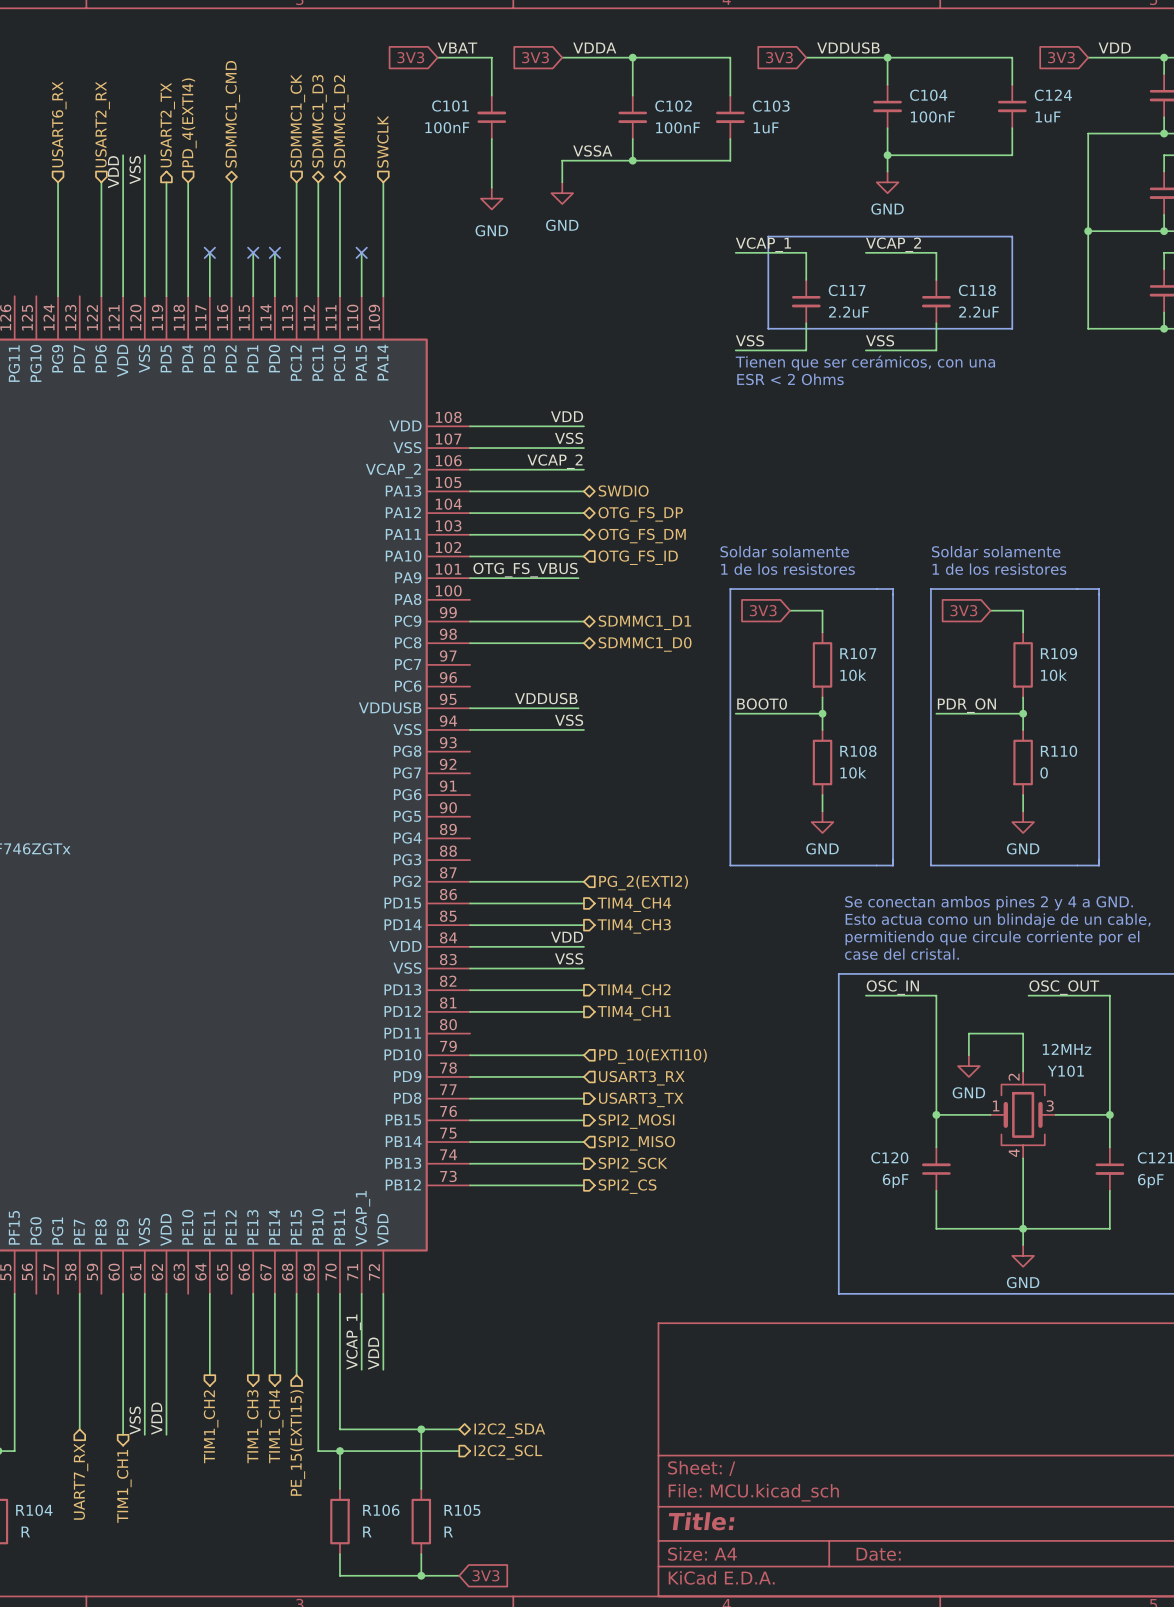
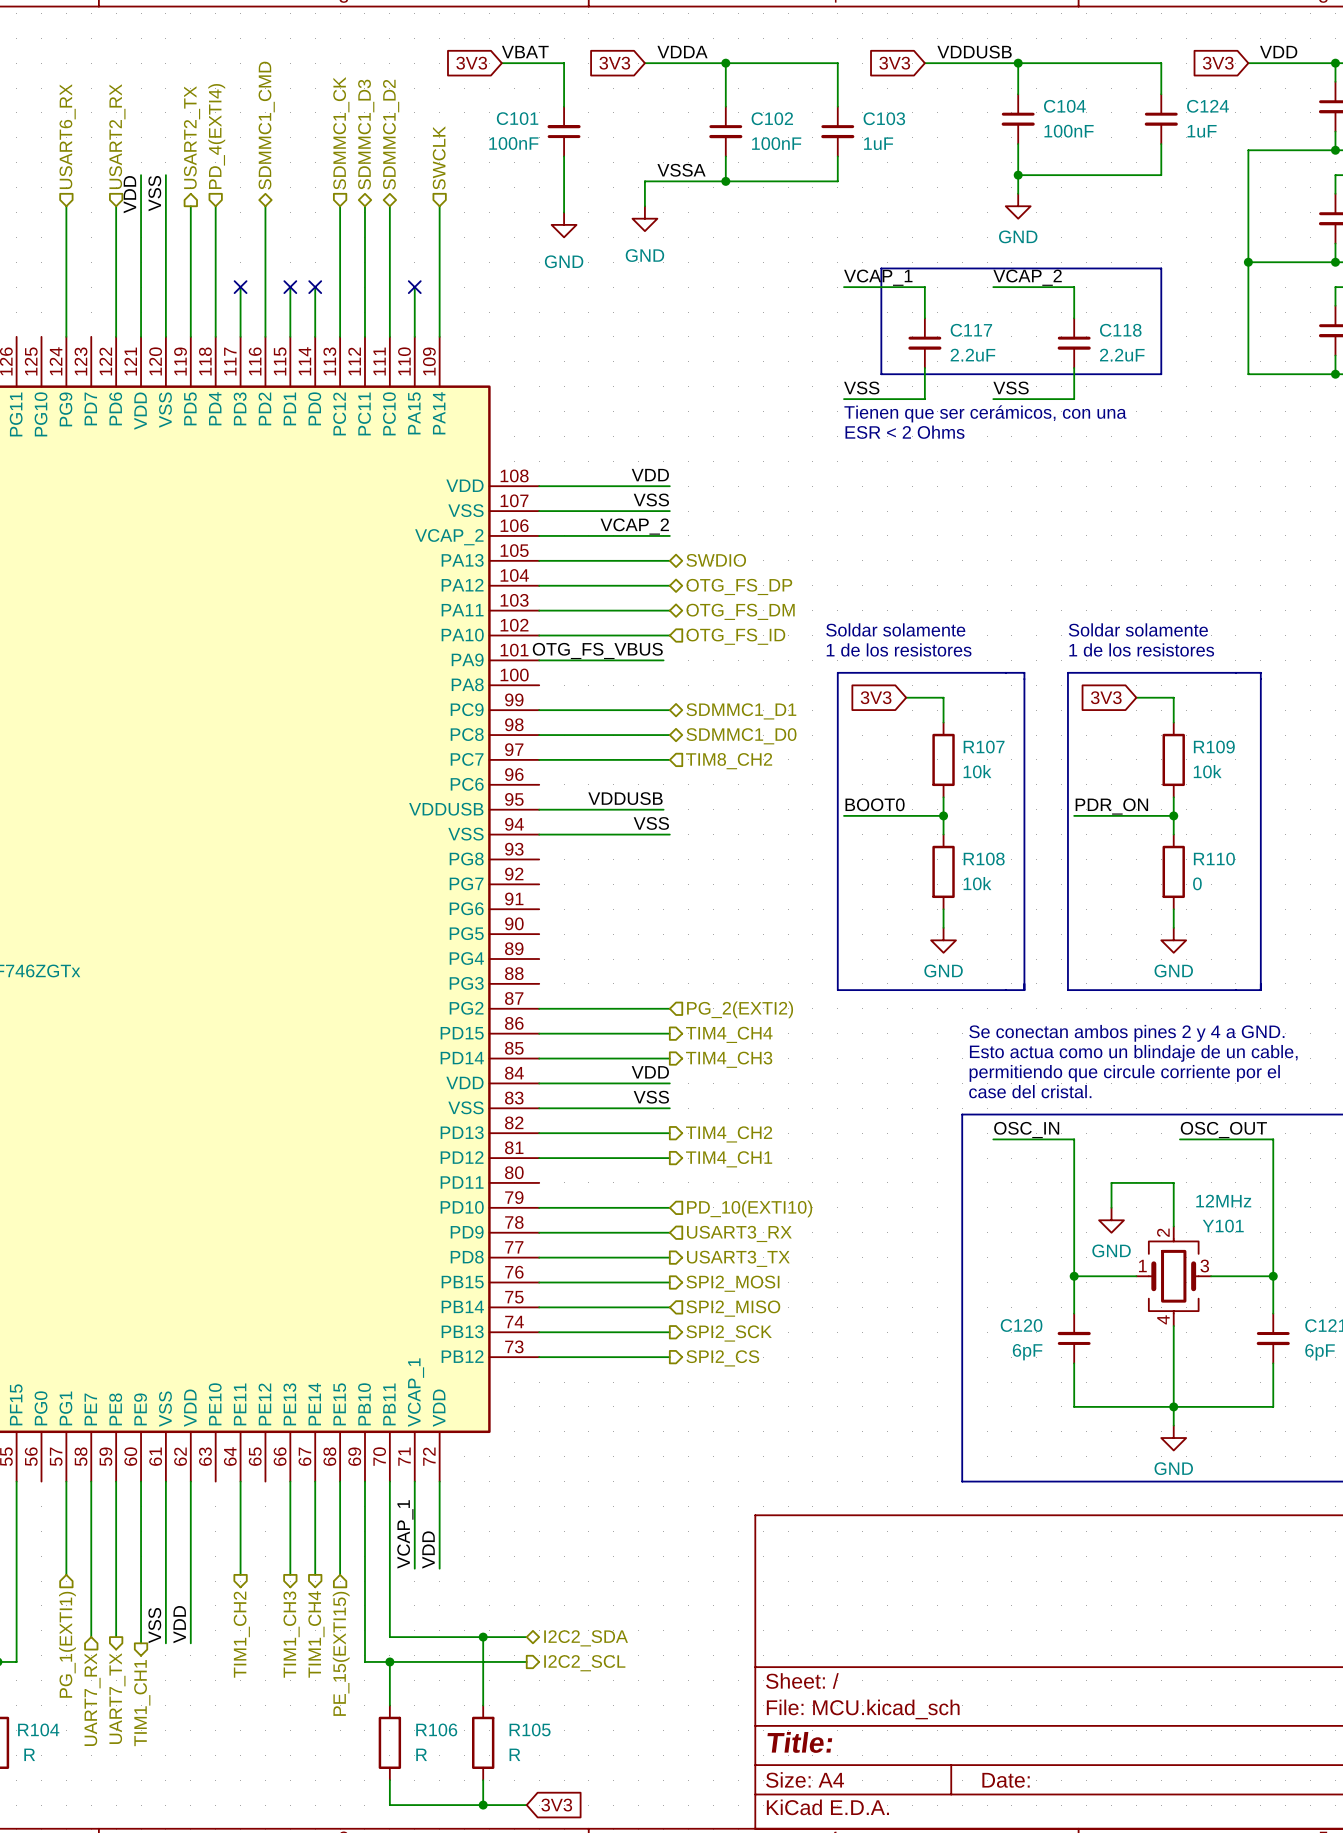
wire: none -> (539, 759) (669, 759)
hierarchical label: none -> TIM8_CH2 (729, 761)
wire: none -> (66, 1481) (66, 1574)
wire: none -> (116, 1481) (116, 1637)
hierarchical label: none -> PG_1(EXTI1) (67, 1644)
hierarchical label: none -> UART7_TX (117, 1698)

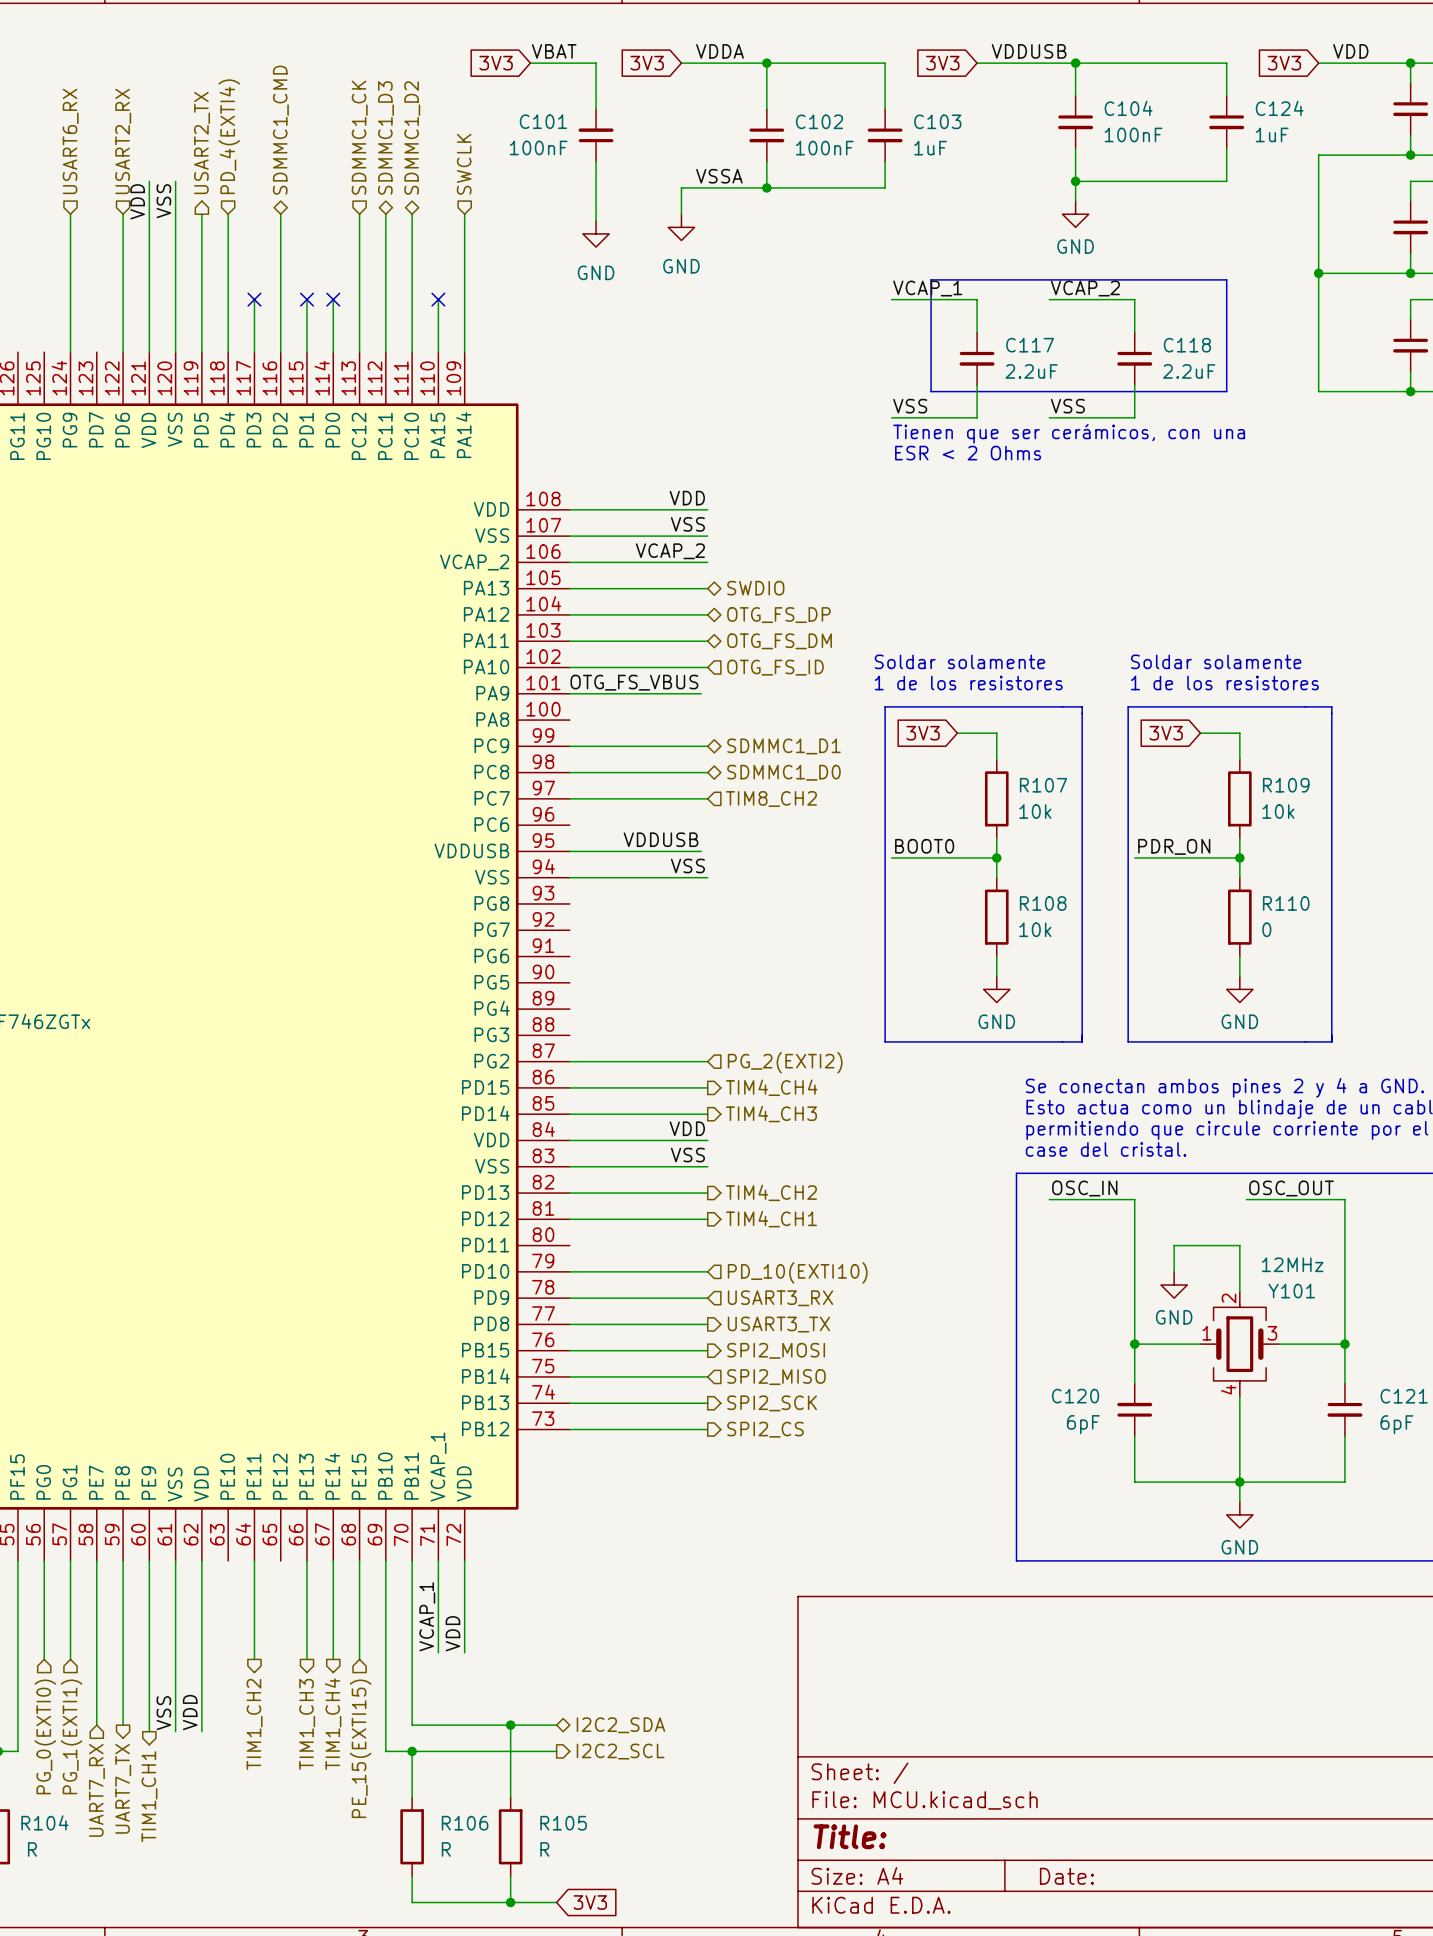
wire: none -> (44, 1560) (44, 1659)
hierarchical label: none -> PG_0(EXTI0) (45, 1736)

